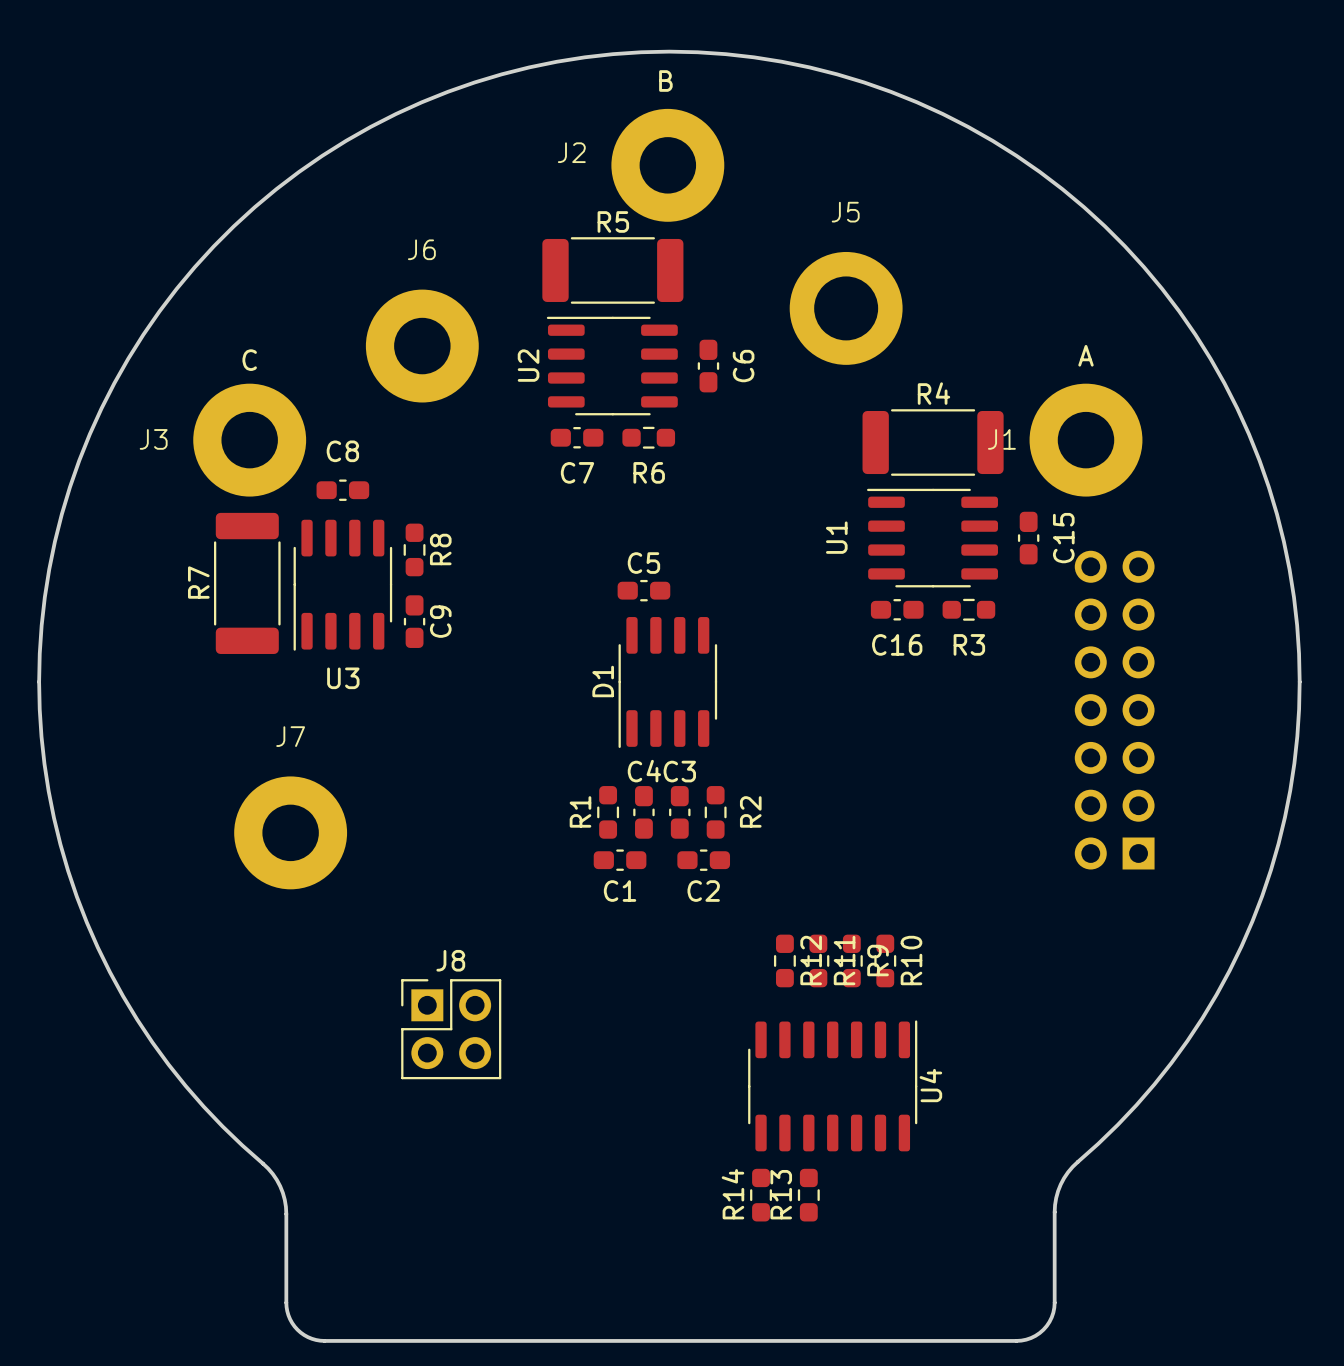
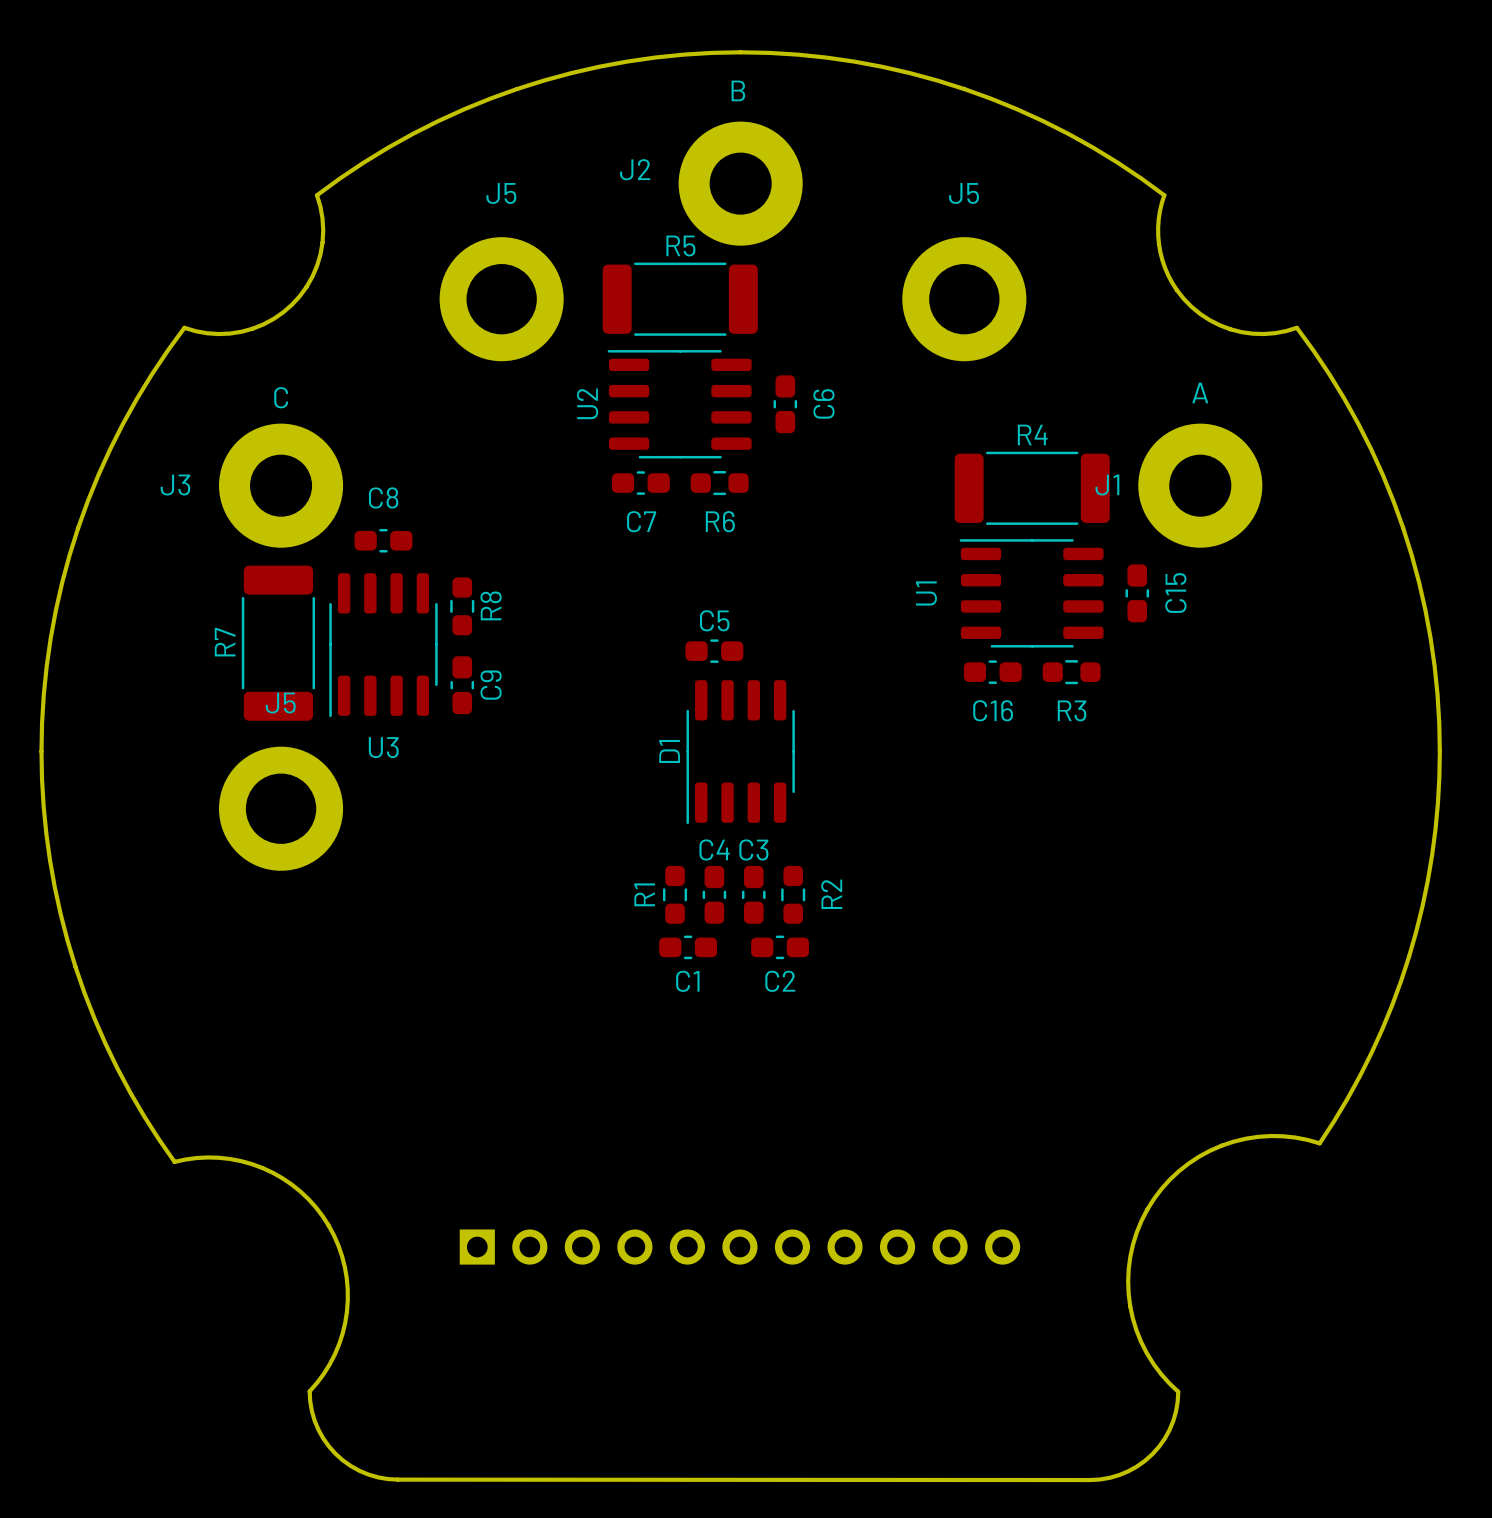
J5: none -> (501, 299)
J5 position: (846, 308) -> (964, 299)
J6: (422, 346) -> none
board edge: (39, 681) (44, 597) (54, 541) (69, 487) (89, 434) (114, 383) (143, 334) (176, 288) (213, 246) (254, 207) (298, 172) (370, 126) (421, 102) (474, 82) (529, 67) (584, 57) (669, 51) (754, 57) (809, 67) (864, 82) (917, 102) (968, 126) (1016, 155) (1062, 189) (1104, 226) (1162, 288) (1195, 334) (1224, 383) (1248, 434) (1268, 487) (1283, 541) (1297, 625) (1299, 681) (1297, 736) (1290, 790) (1270, 870) (1252, 921) (1216, 994) (1171, 1063) (1117, 1124) (1072, 1166) (1060, 1184) (1056, 1197) (1054, 1212) (1054, 1307) (1049, 1321) (1039, 1333) (1031, 1338) (1016, 1340) (324, 1340) (304, 1335) (294, 1326) (288, 1315) (286, 1302) (285, 1206) (282, 1192) (276, 1179) (268, 1168) (203, 1106) (168, 1064) (123, 996) (86, 922) (68, 870) (53, 817) (44, 763) (39, 681) -> (740, 52) (655, 57) (599, 66) (517, 89) (438, 121) (387, 147) (317, 195) (323, 230) (320, 254) (306, 287) (283, 312) (263, 324) (229, 333) (206, 333) (184, 327) (137, 398) (110, 448) (78, 527) (55, 610) (43, 694) (41, 751) (46, 833) (60, 914) (84, 993) (105, 1043) (130, 1092) (174, 1161) (196, 1158) (218, 1157) (241, 1161) (262, 1167) (282, 1178) (300, 1191) (315, 1207) (328, 1225) (338, 1245) (344, 1267) (347, 1289) (346, 1311) (339, 1344) (323, 1373) (309, 1391) (310, 1401) (314, 1420) (323, 1438) (335, 1453) (359, 1470) (378, 1477) (397, 1479) (1089, 1480) (1109, 1477) (1136, 1466) (1159, 1446) (1169, 1430) (1177, 1401) (1178, 1391) (1153, 1363) (1141, 1342) (1130, 1306) (1128, 1281) (1130, 1256) (1136, 1232) (1147, 1209) (1161, 1189) (1178, 1171) (1199, 1156) (1221, 1145) (1245, 1138) (1270, 1136) (1295, 1137) (1319, 1143) (1347, 1099) (1371, 1053) (1401, 981) (1416, 931) (1427, 880) (1435, 829) (1439, 777) (1439, 723) (1434, 666) (1419, 582) (1403, 527) (1370, 448) (1329, 374) (1296, 327) (1263, 334) (1230, 329) (1200, 314) (1176, 289) (1165, 268) (1158, 244) (1158, 219) (1164, 195) (1117, 162) (1068, 133) (1017, 109) (964, 89) (909, 73) (853, 61) (797, 54) (740, 52)
part: (1114, 710) -> none
J5: none -> (281, 808)
J7: (290, 832) -> none
R12: (784, 960) -> none
R11: (818, 960) -> none
R9: (851, 960) -> none
R10: (885, 960) -> none
J8: (451, 1029) -> none
U4: (832, 1085) -> none
part: none -> (739, 1247)
R14: (761, 1195) -> none
R13: (808, 1195) -> none

